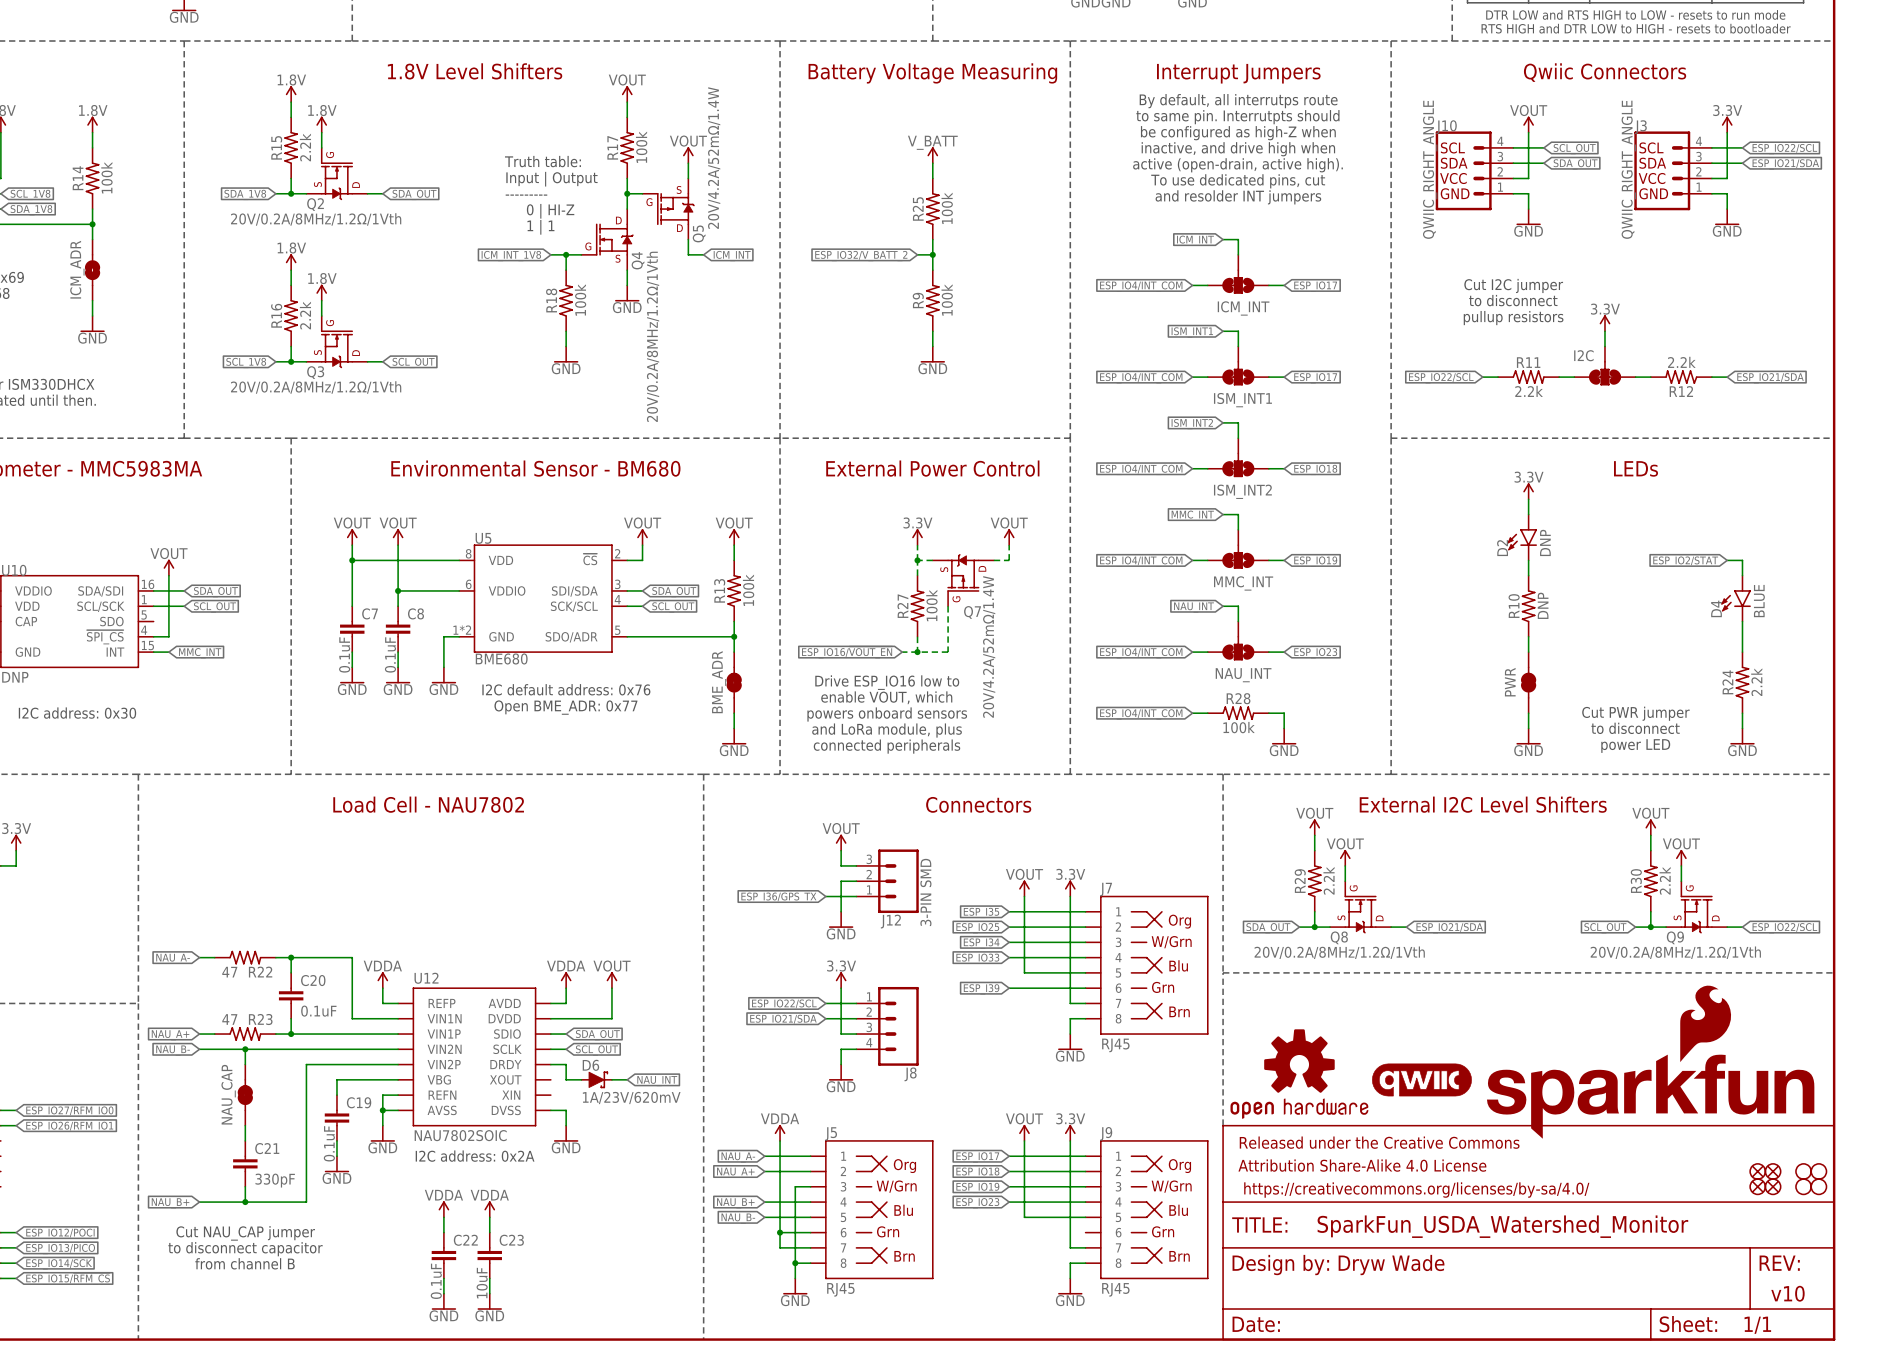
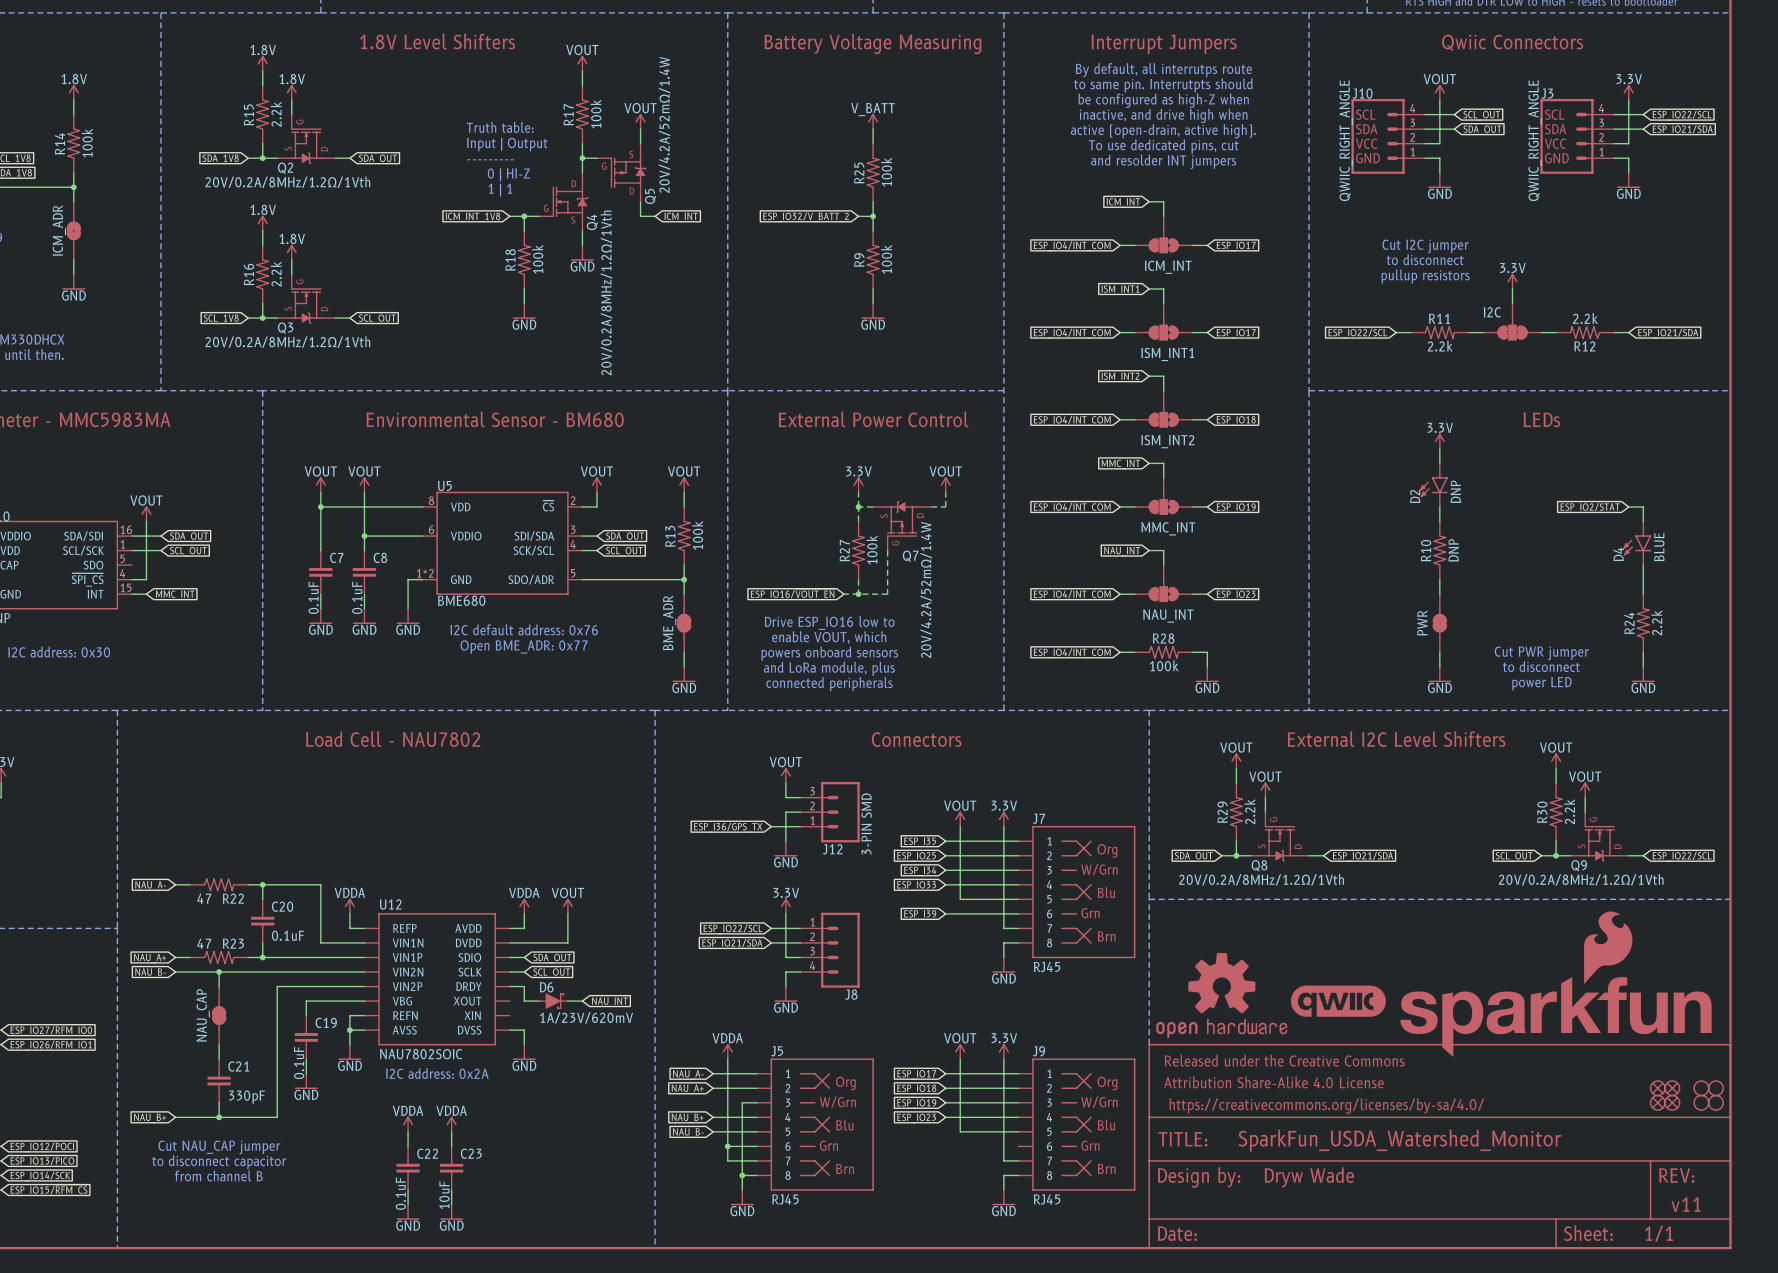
text: v10 (1787, 1293) -> v11 (1686, 1204)

